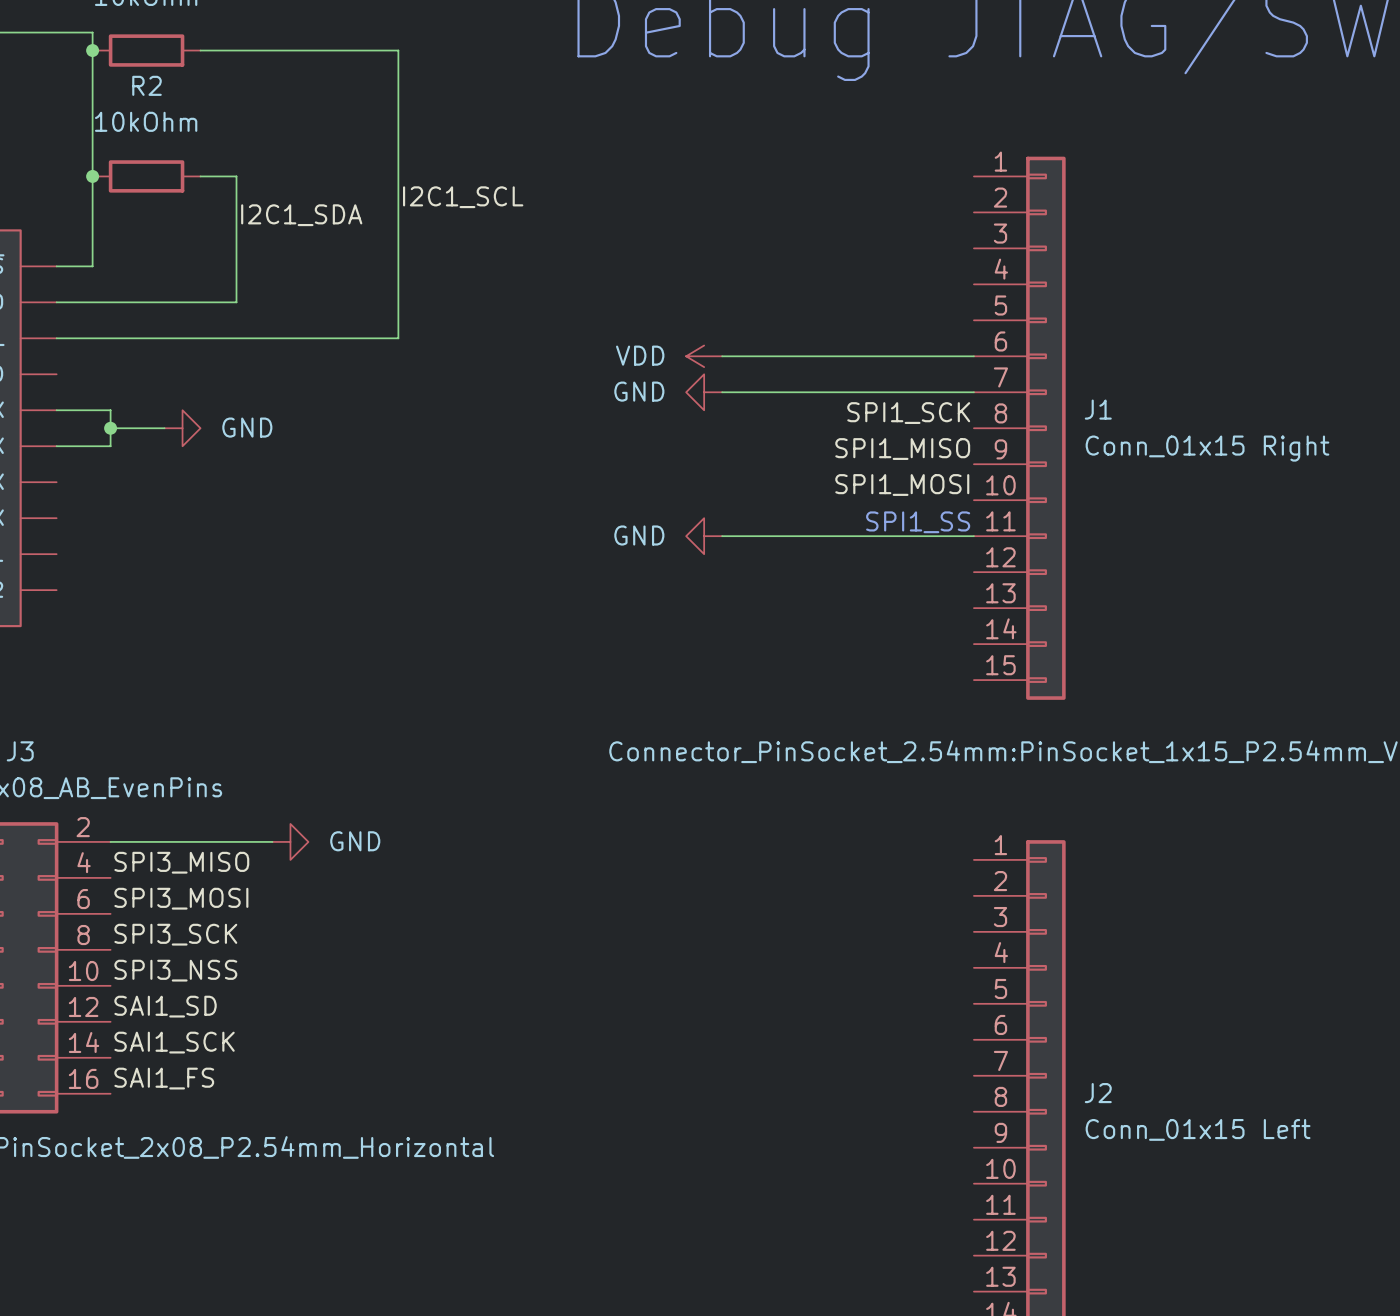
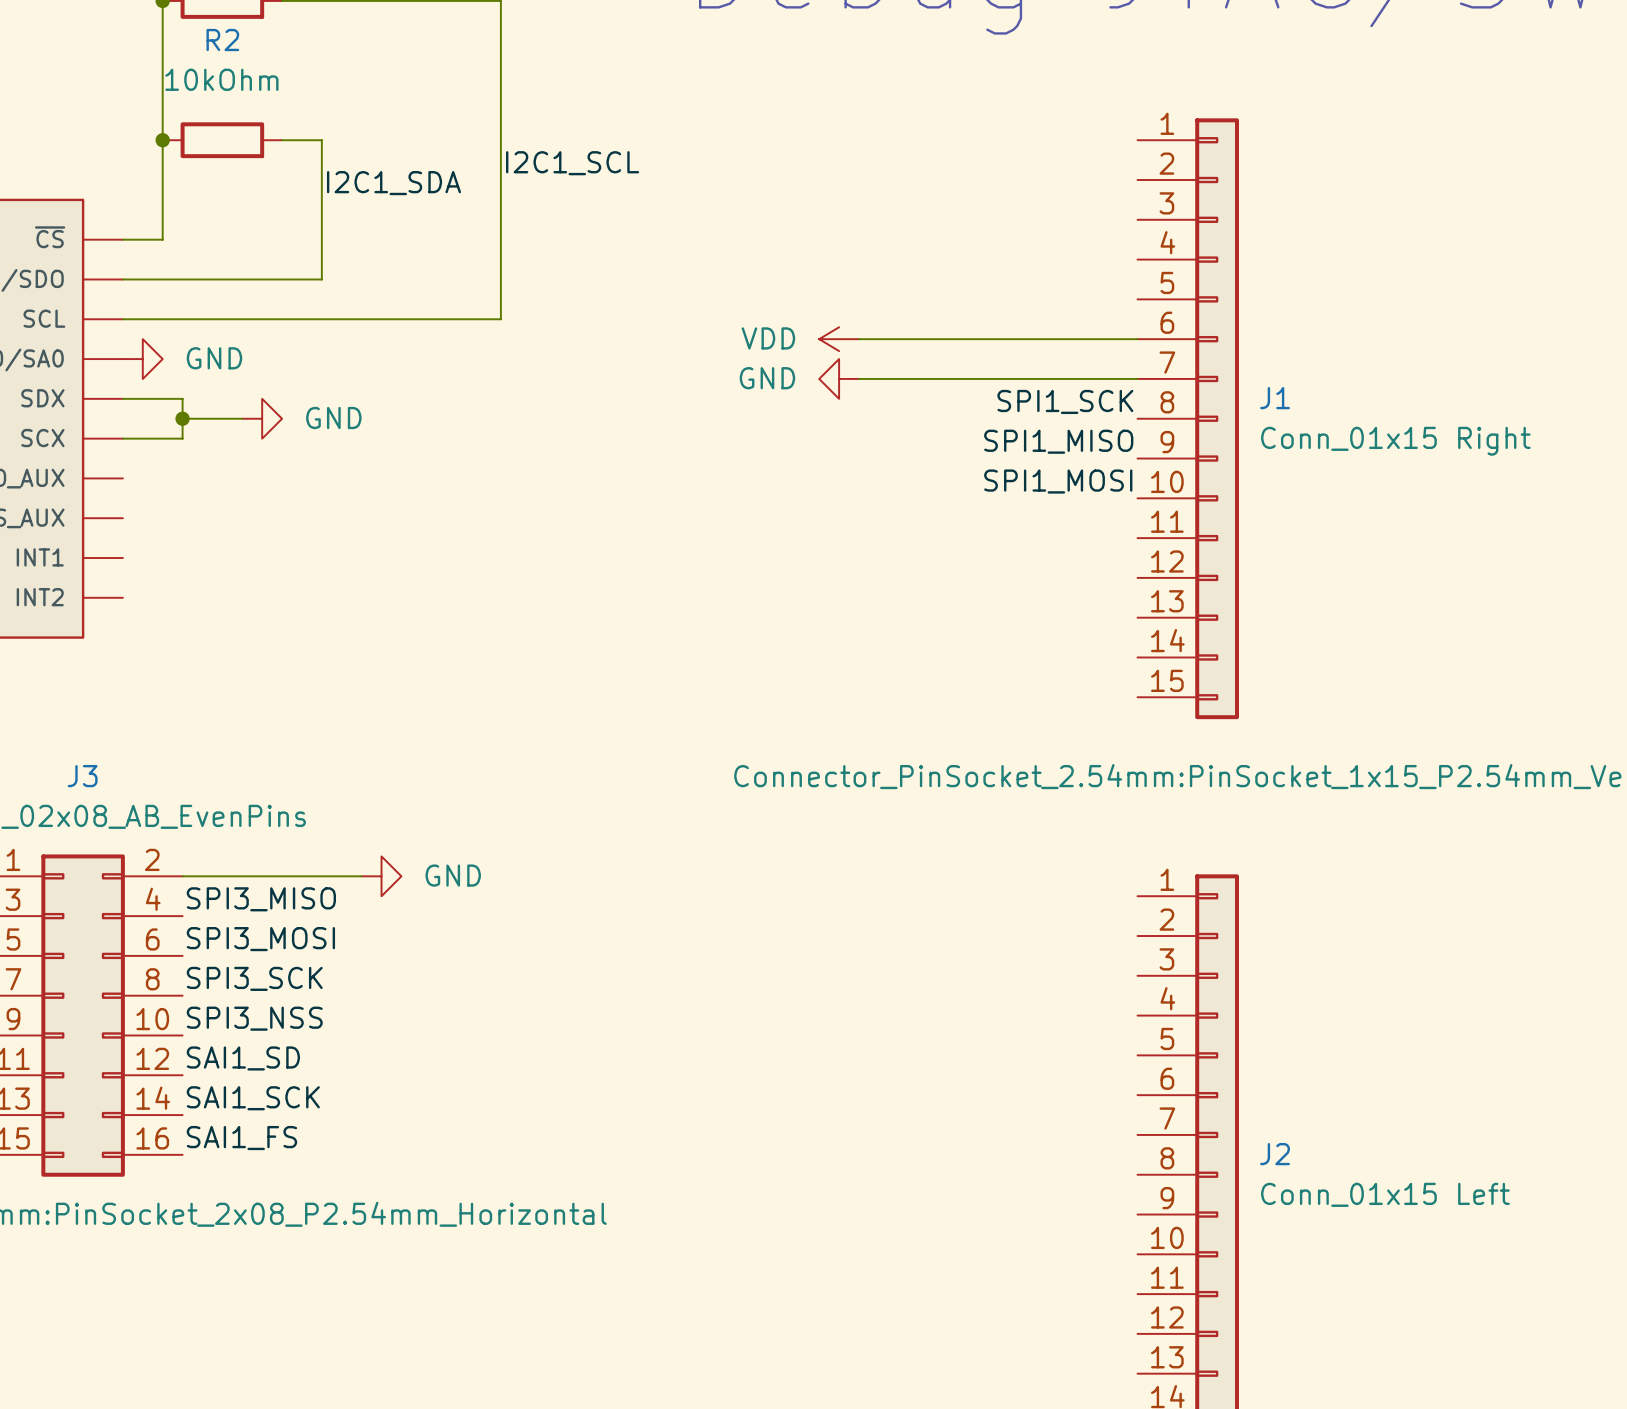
power symbol: none -> GND (142, 359)
text: SPI1_SS (918, 522) -> none
power symbol: GND (704, 536) -> none
wire: (722, 536) (973, 536) -> none

